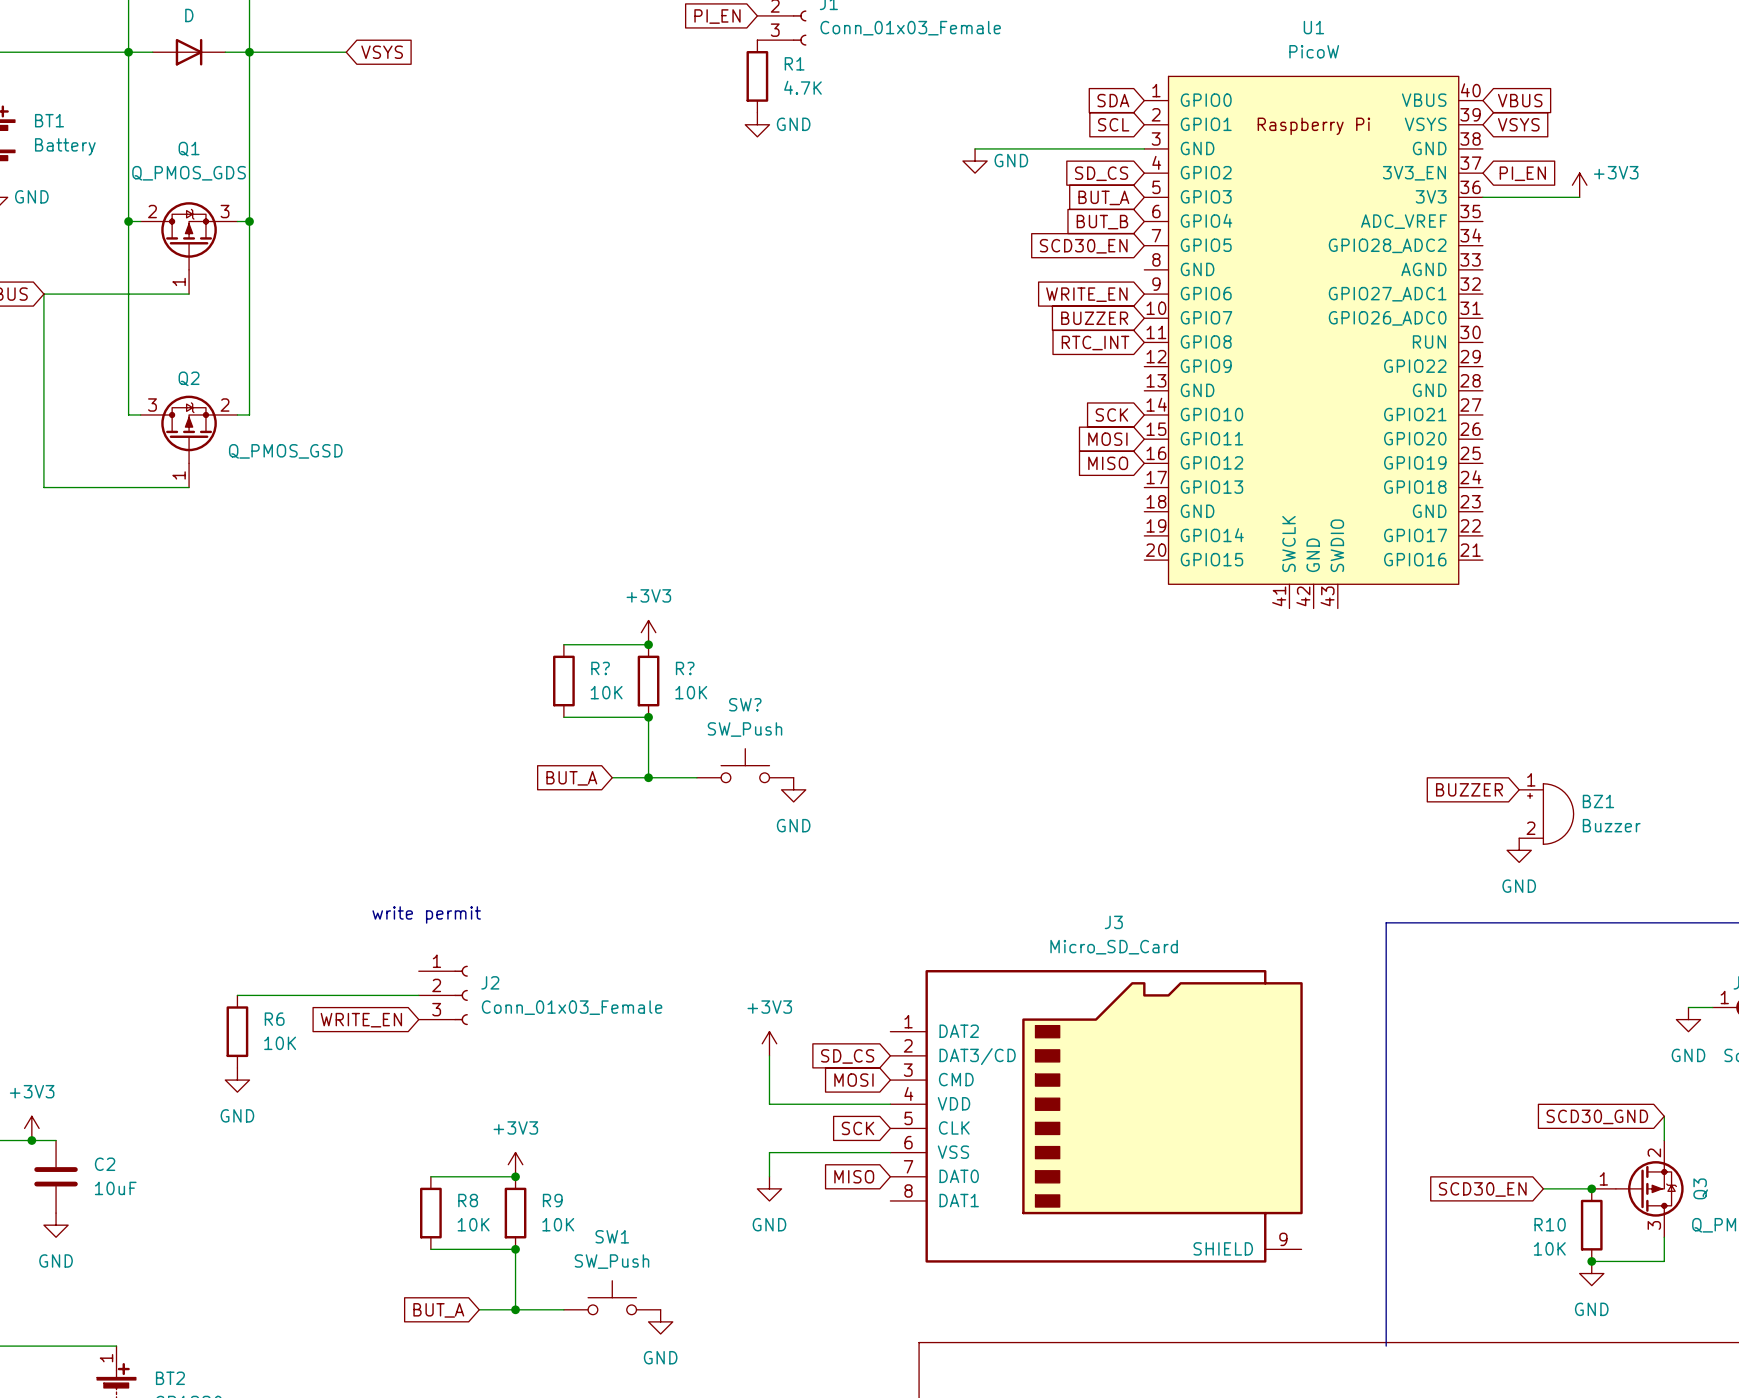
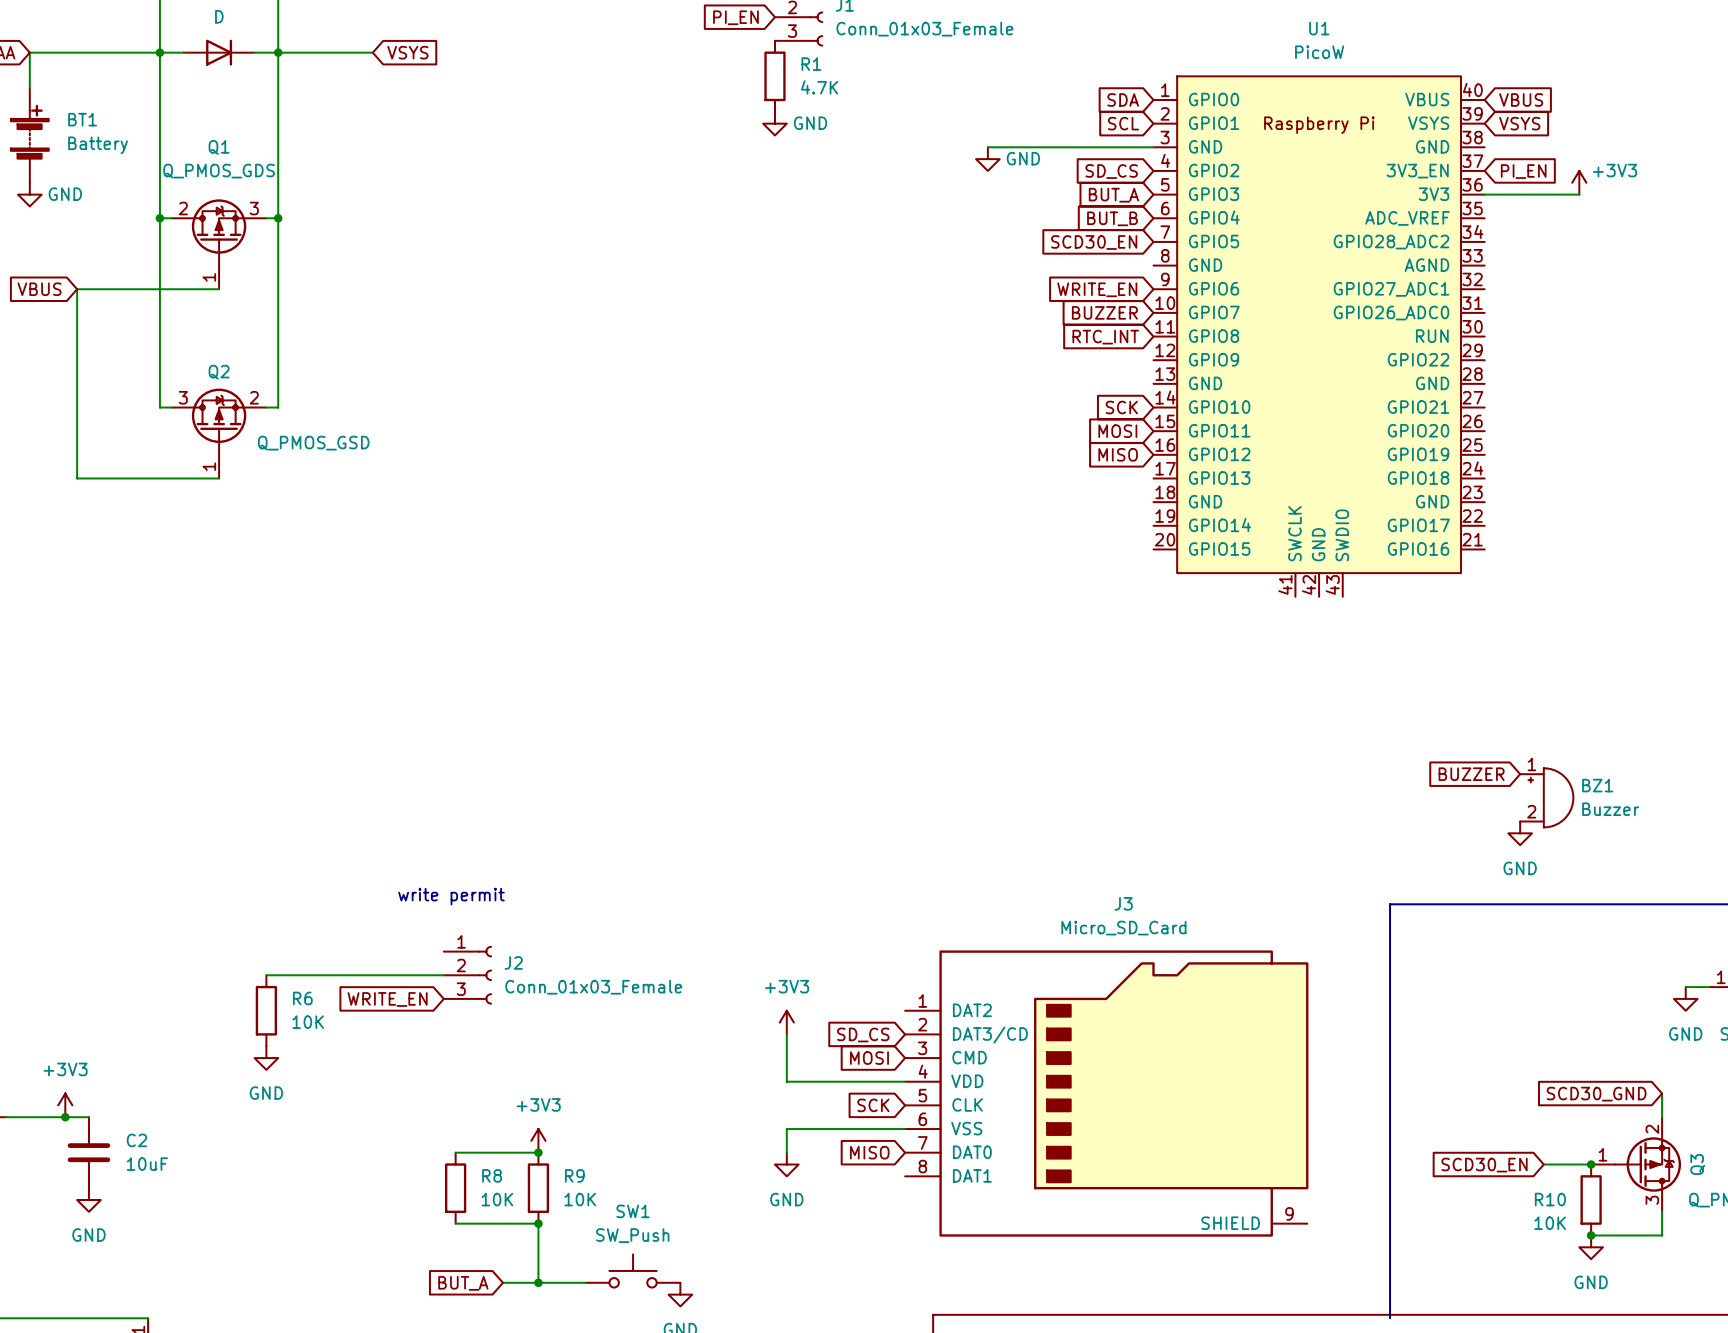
power symbol: +3V3 (648, 632) -> none
wire: (563, 644) (648, 644) -> none
junction: (648, 644) -> none
R?: 10K (563, 681) -> none
R?: 10K (648, 681) -> none
wire: (563, 717) (648, 717) (648, 777) -> none
junction: (648, 717) -> none
SW?: SW_Push (745, 765) -> none
wire: (612, 777) (696, 777) -> none
junction: (648, 777) -> none
global label: BUT_A (571, 778) -> none
power symbol: GND (793, 789) -> none

